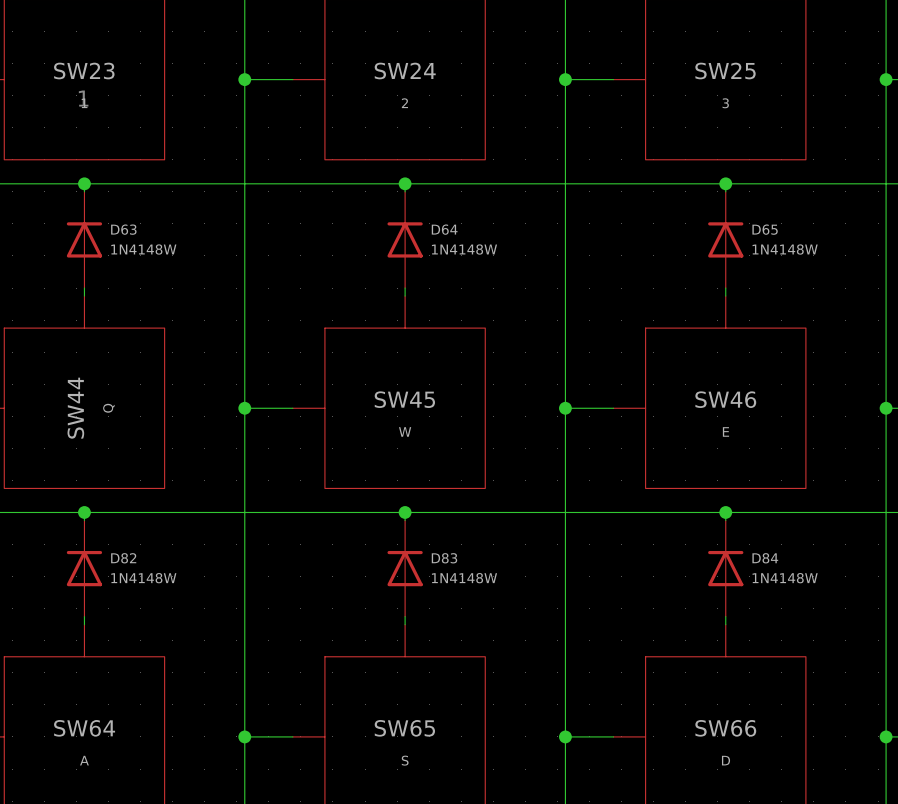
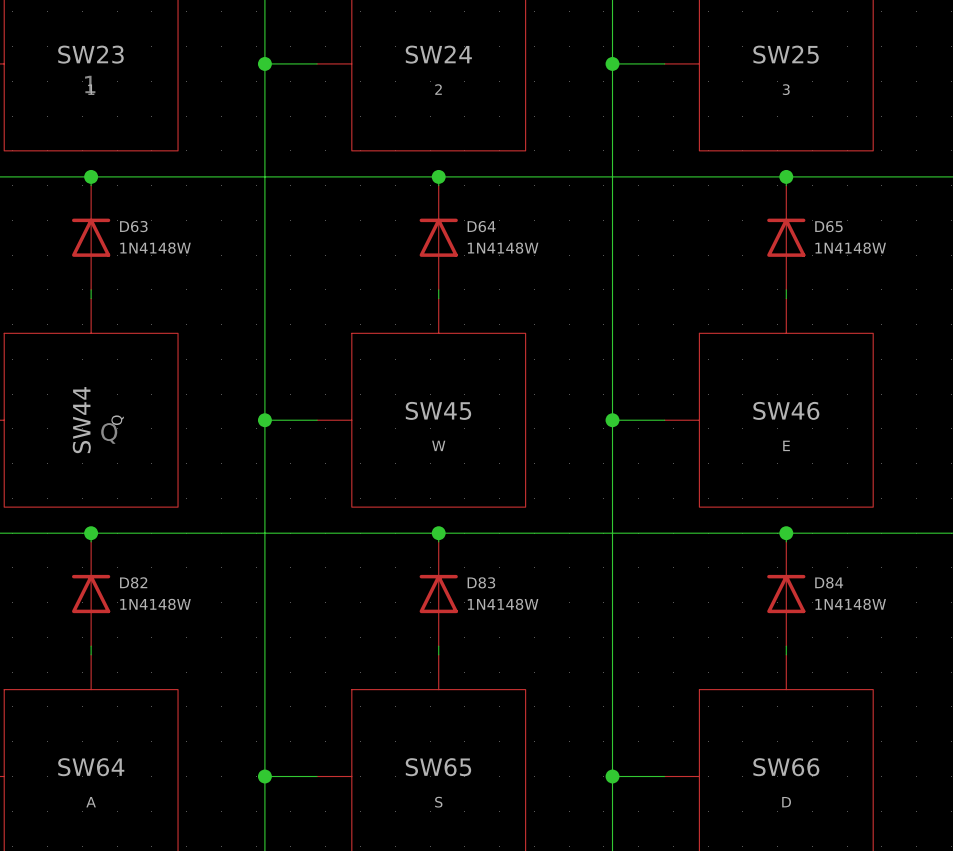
text: none -> Q (109, 433)

